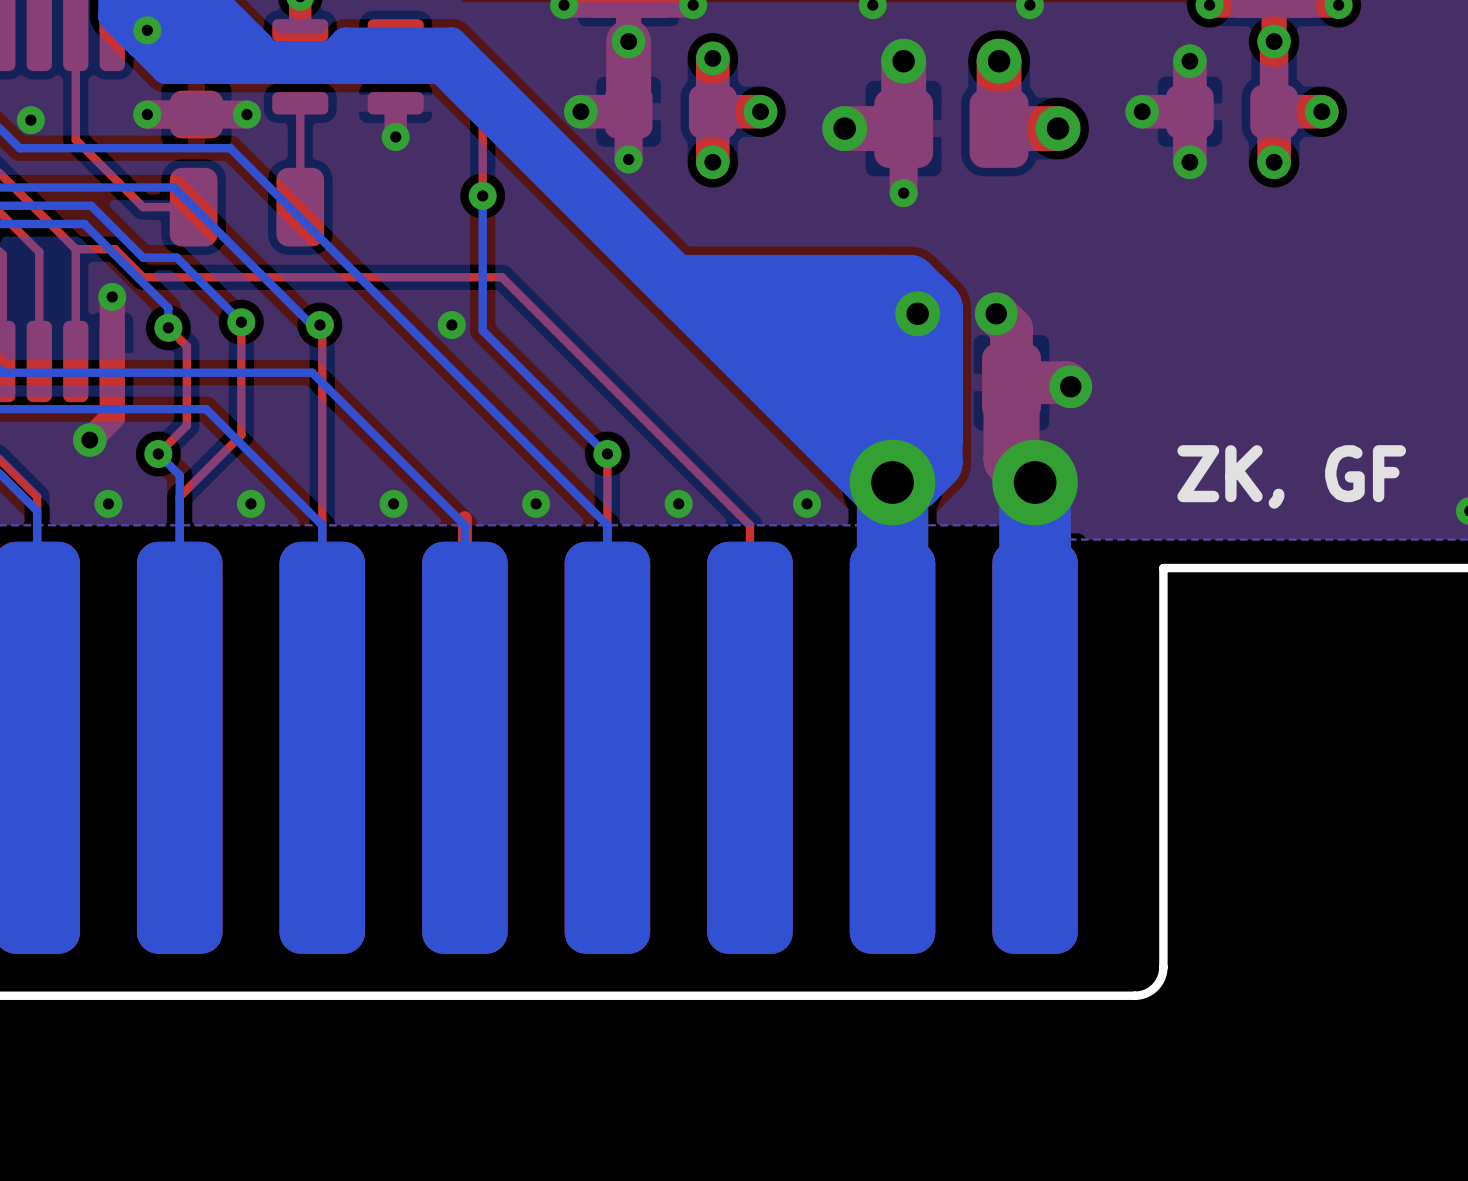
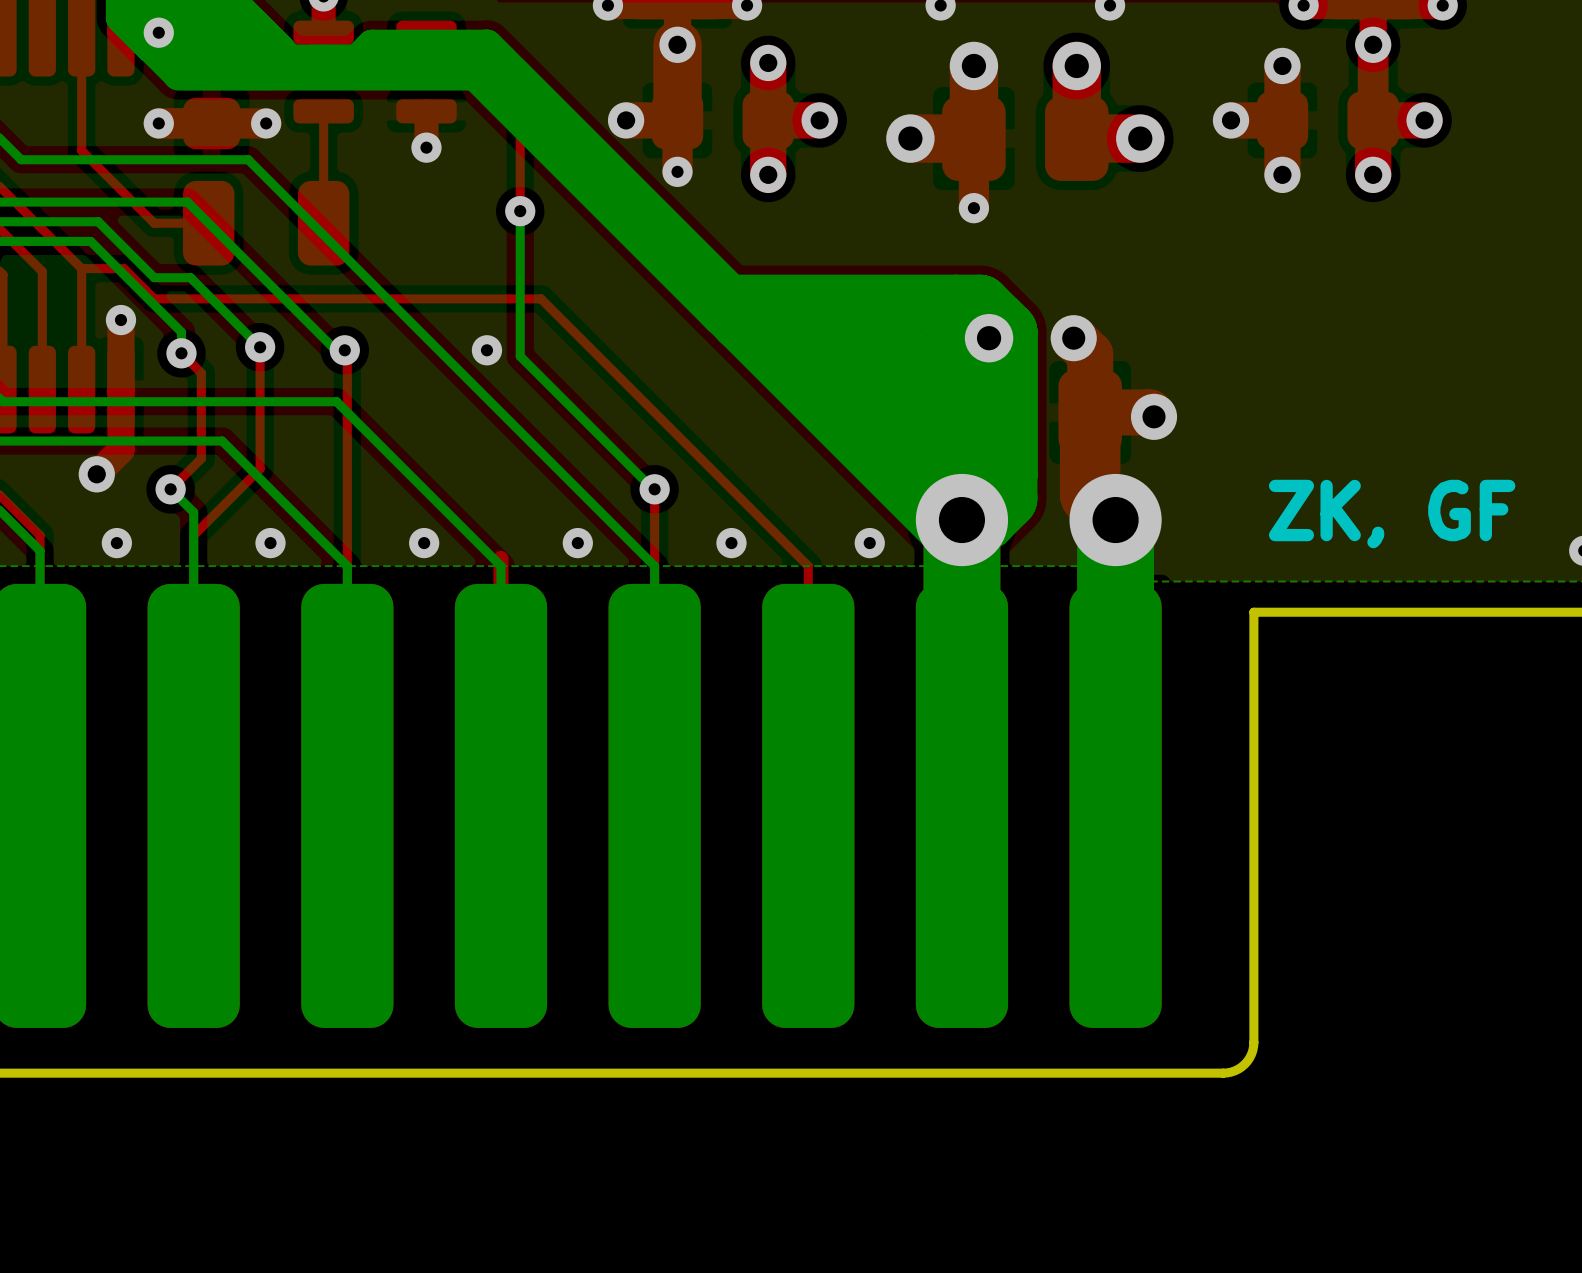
via: (30, 120) -> none

